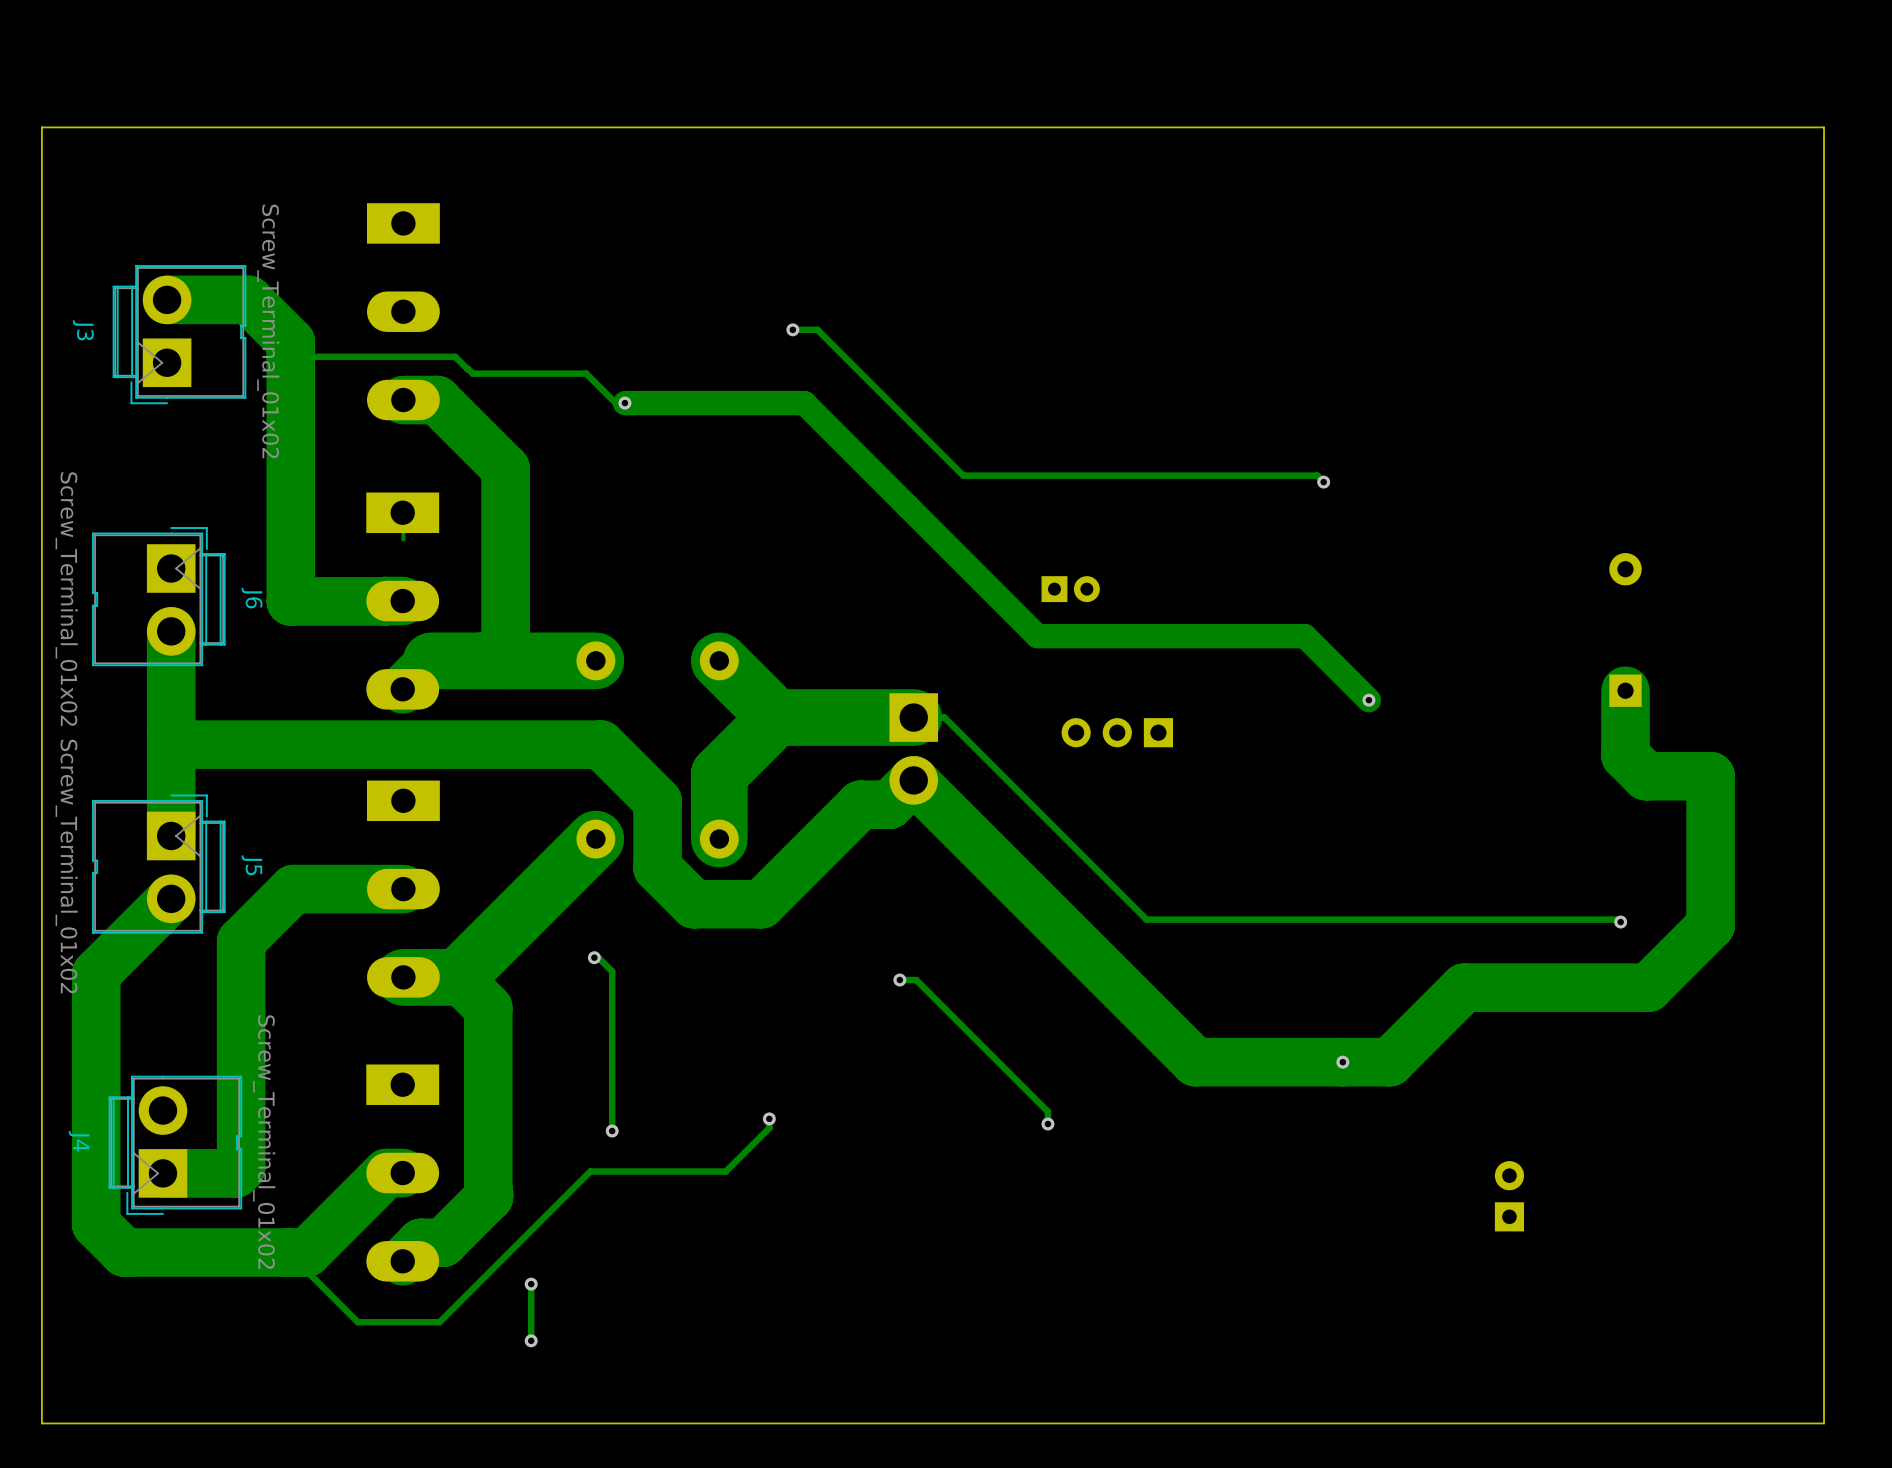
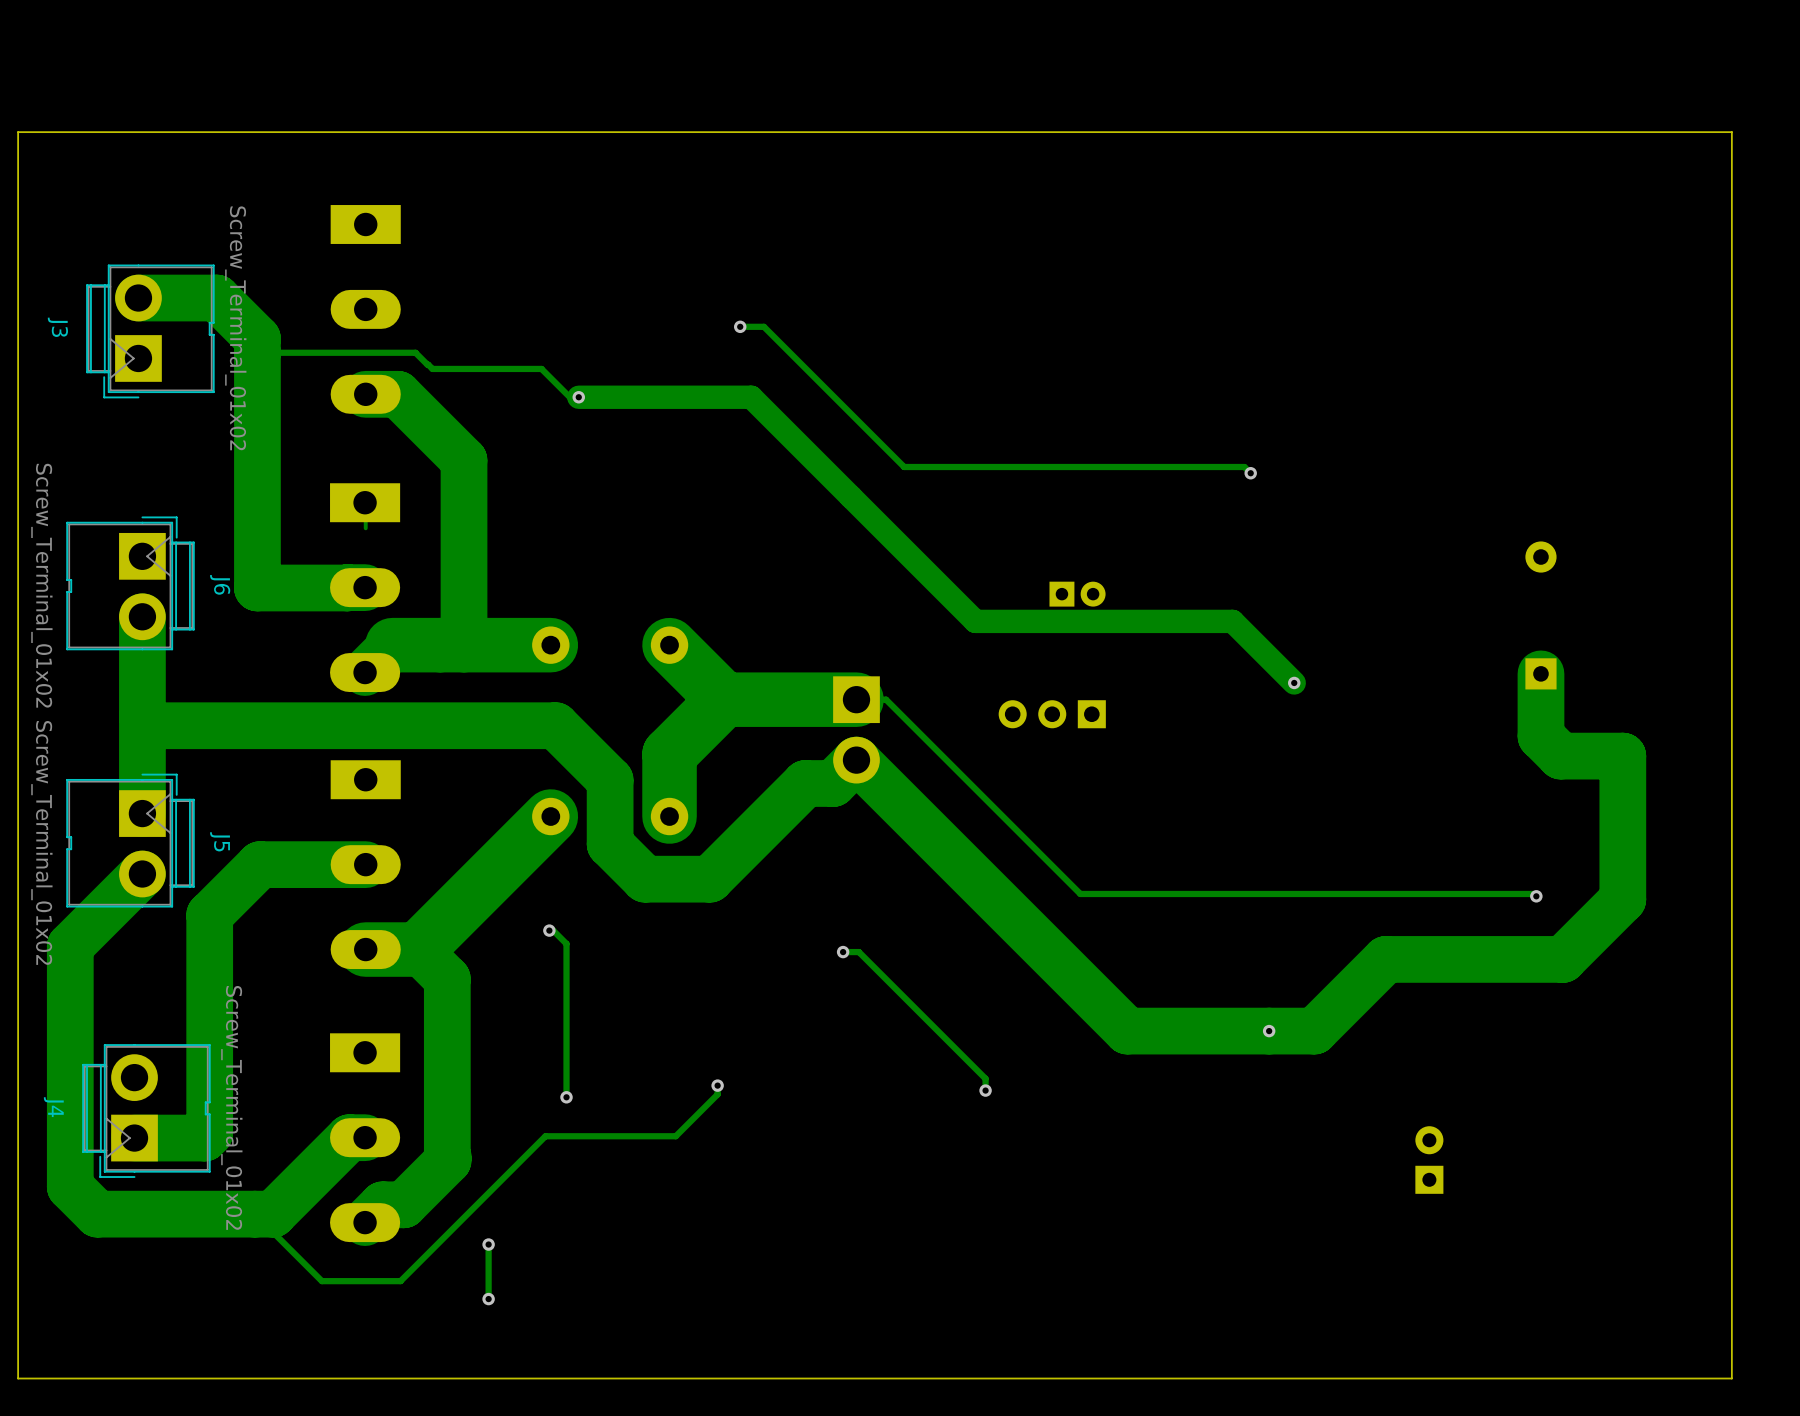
part position: (1070, 589) -> (1077, 594)

